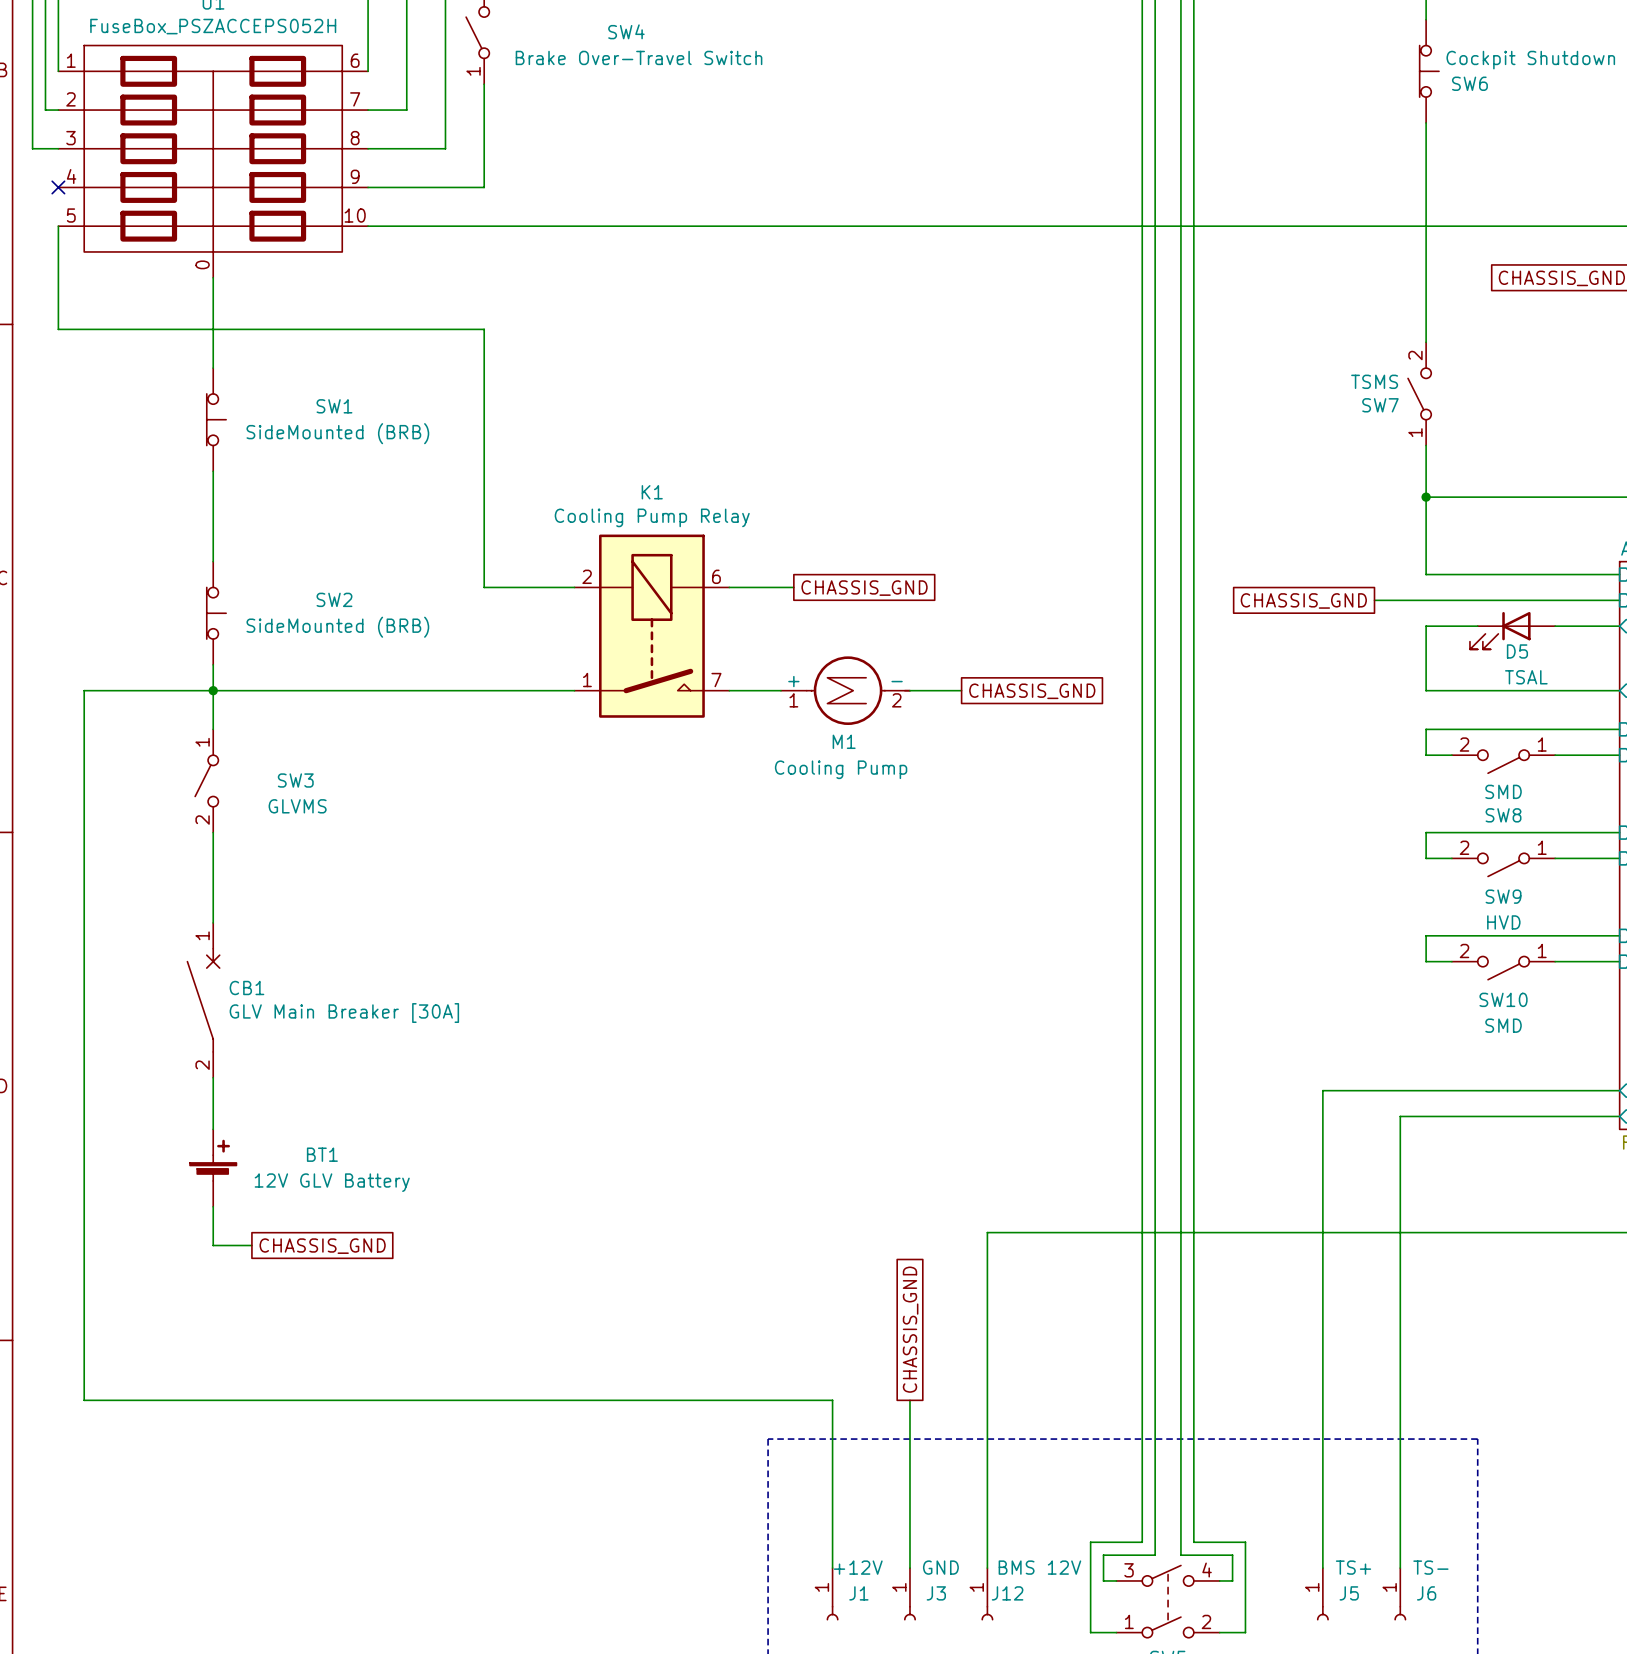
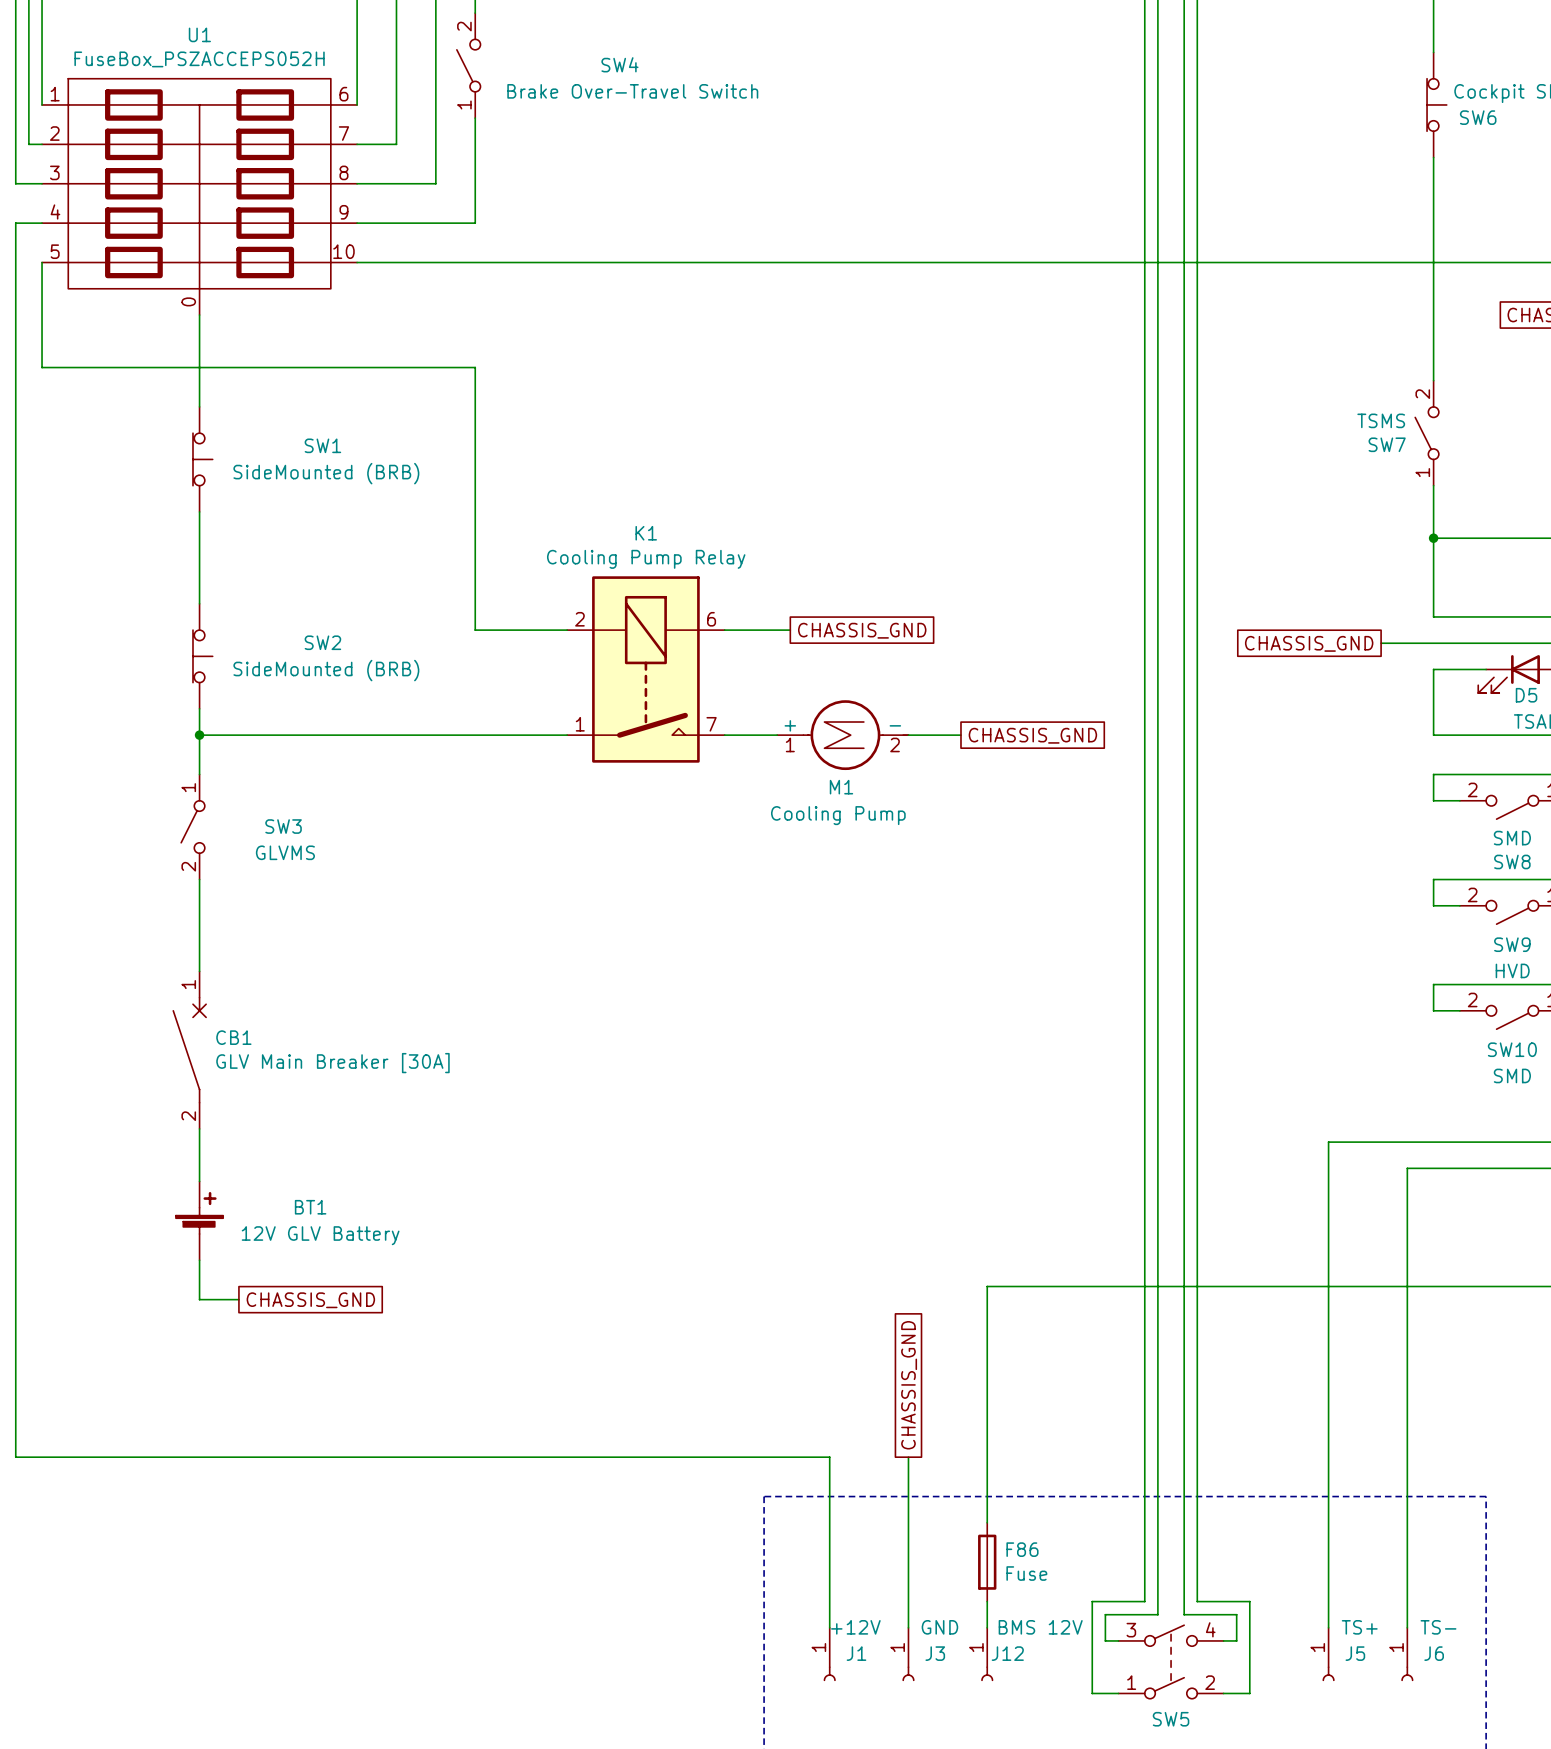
no-connect mark: (58, 187) -> none
wire: (213, 690) (84, 690) (84, 1400) -> (42, 223) (15, 223) (15, 1457) (68, 1457)
F86: none -> Fuse (987, 1562)

